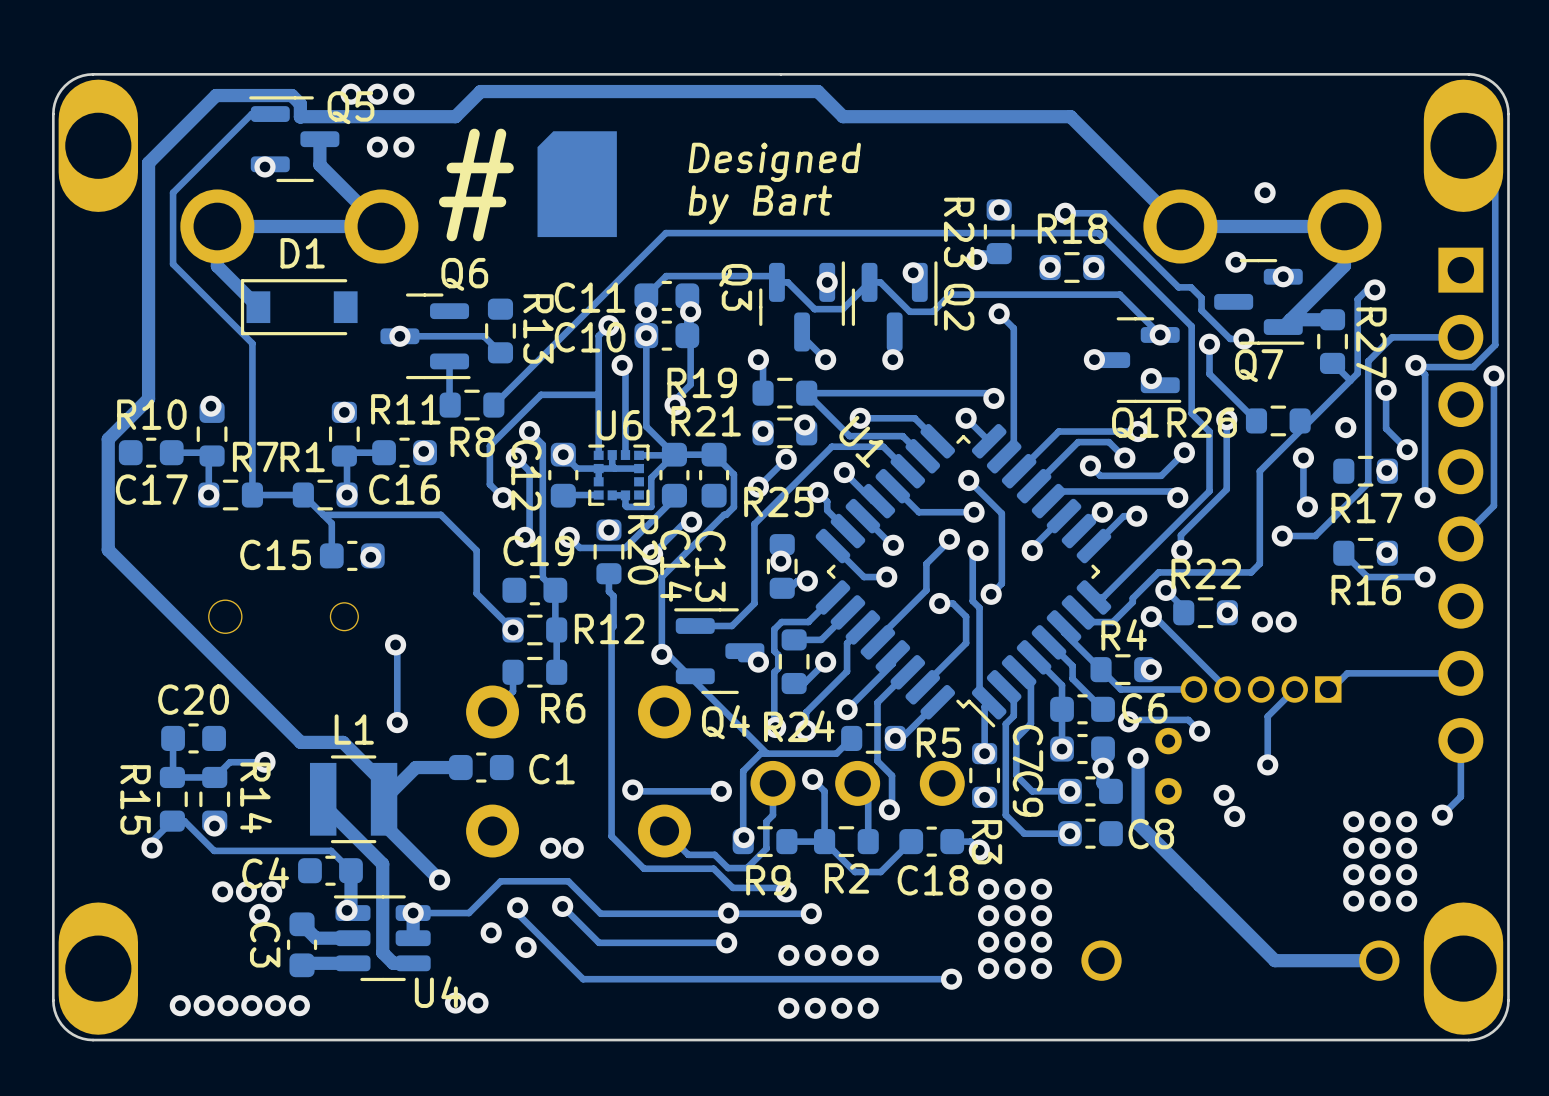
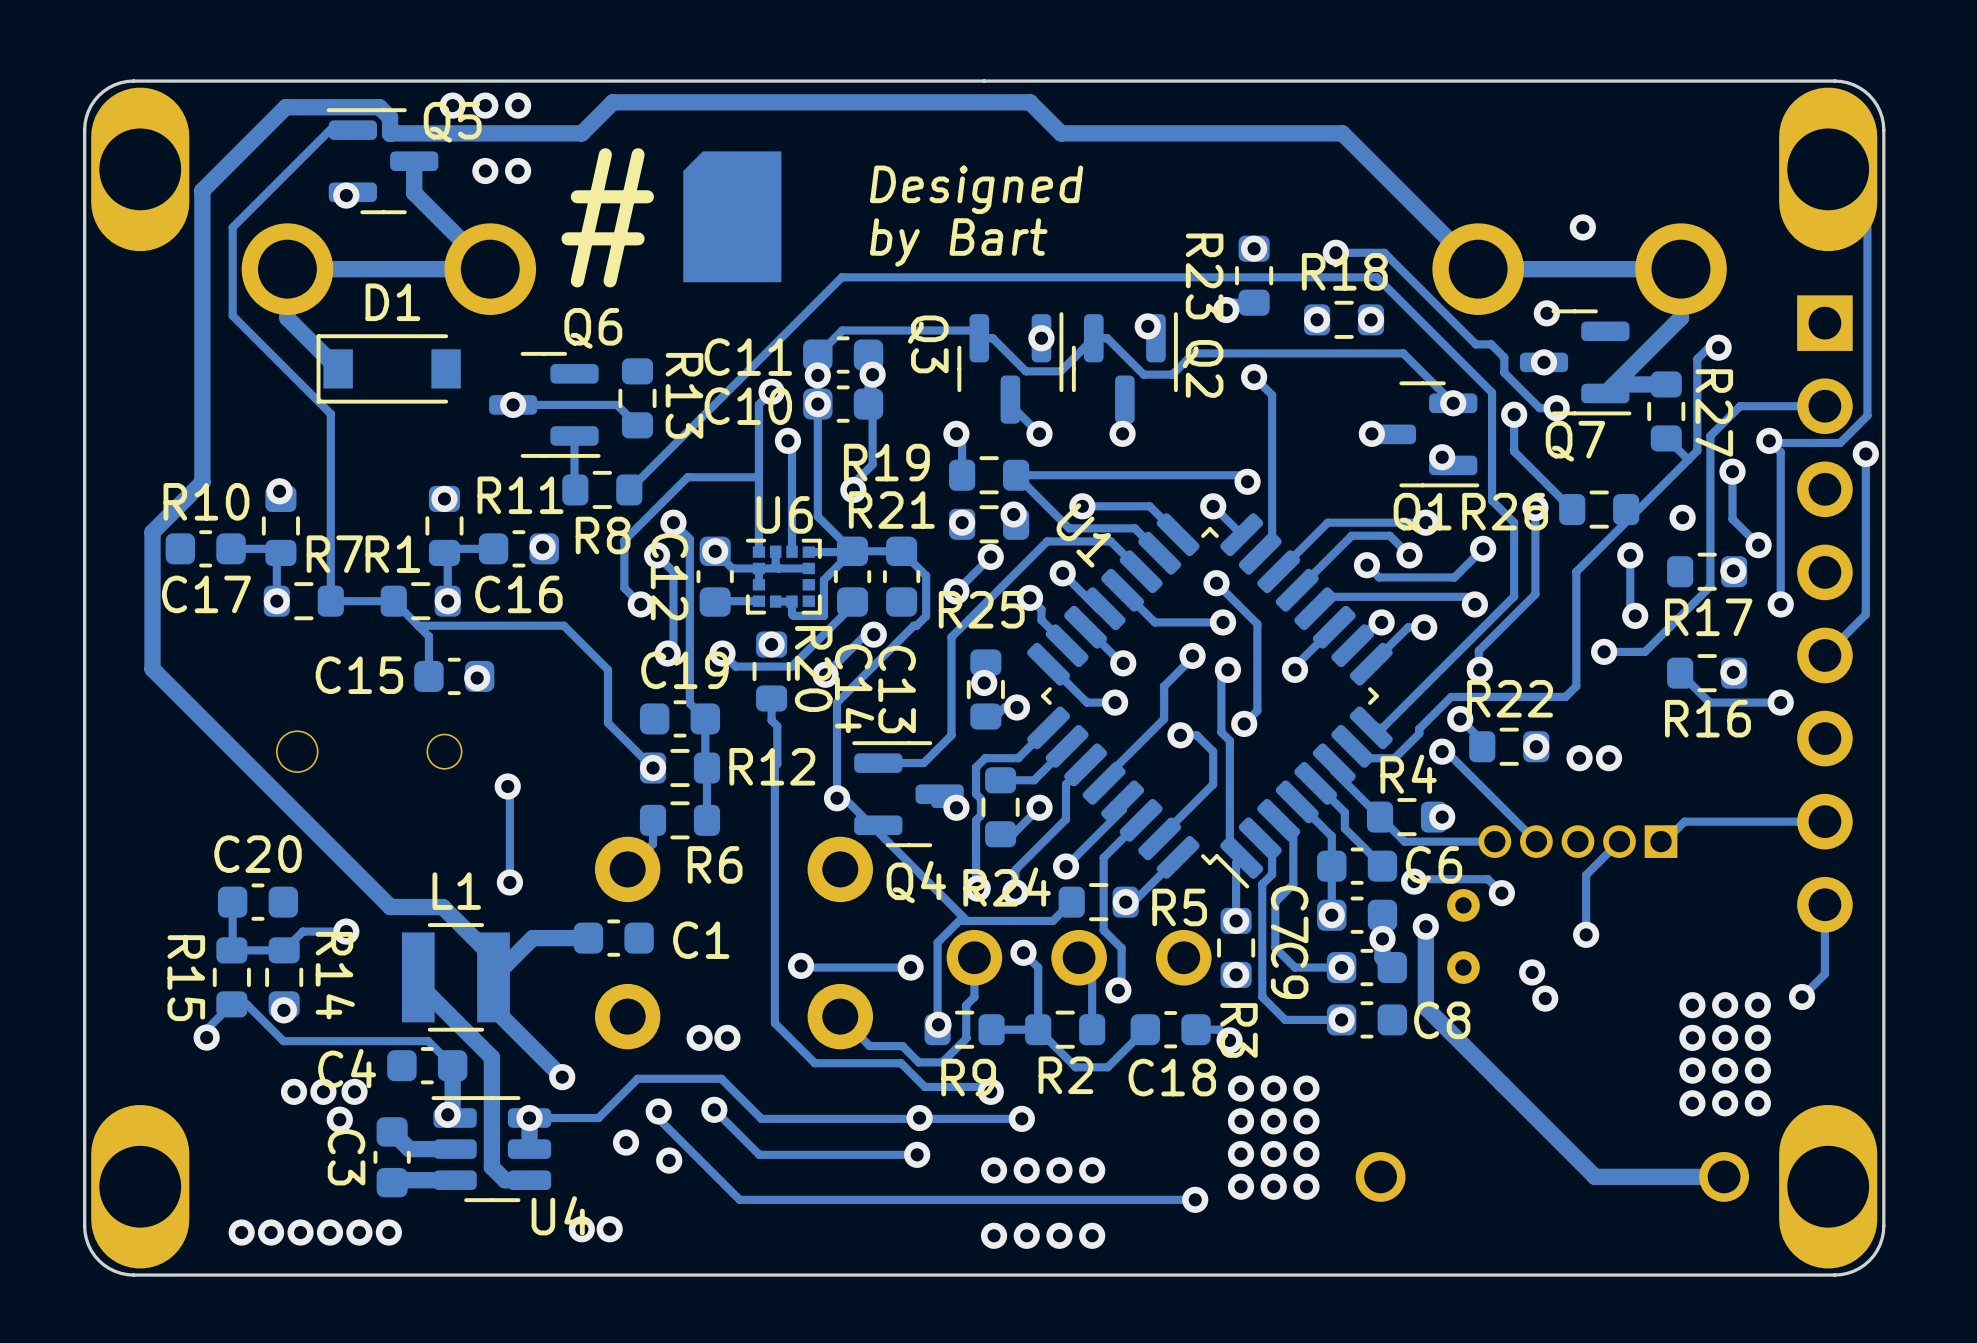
via position: (1283, 276) -> (1544, 362)

